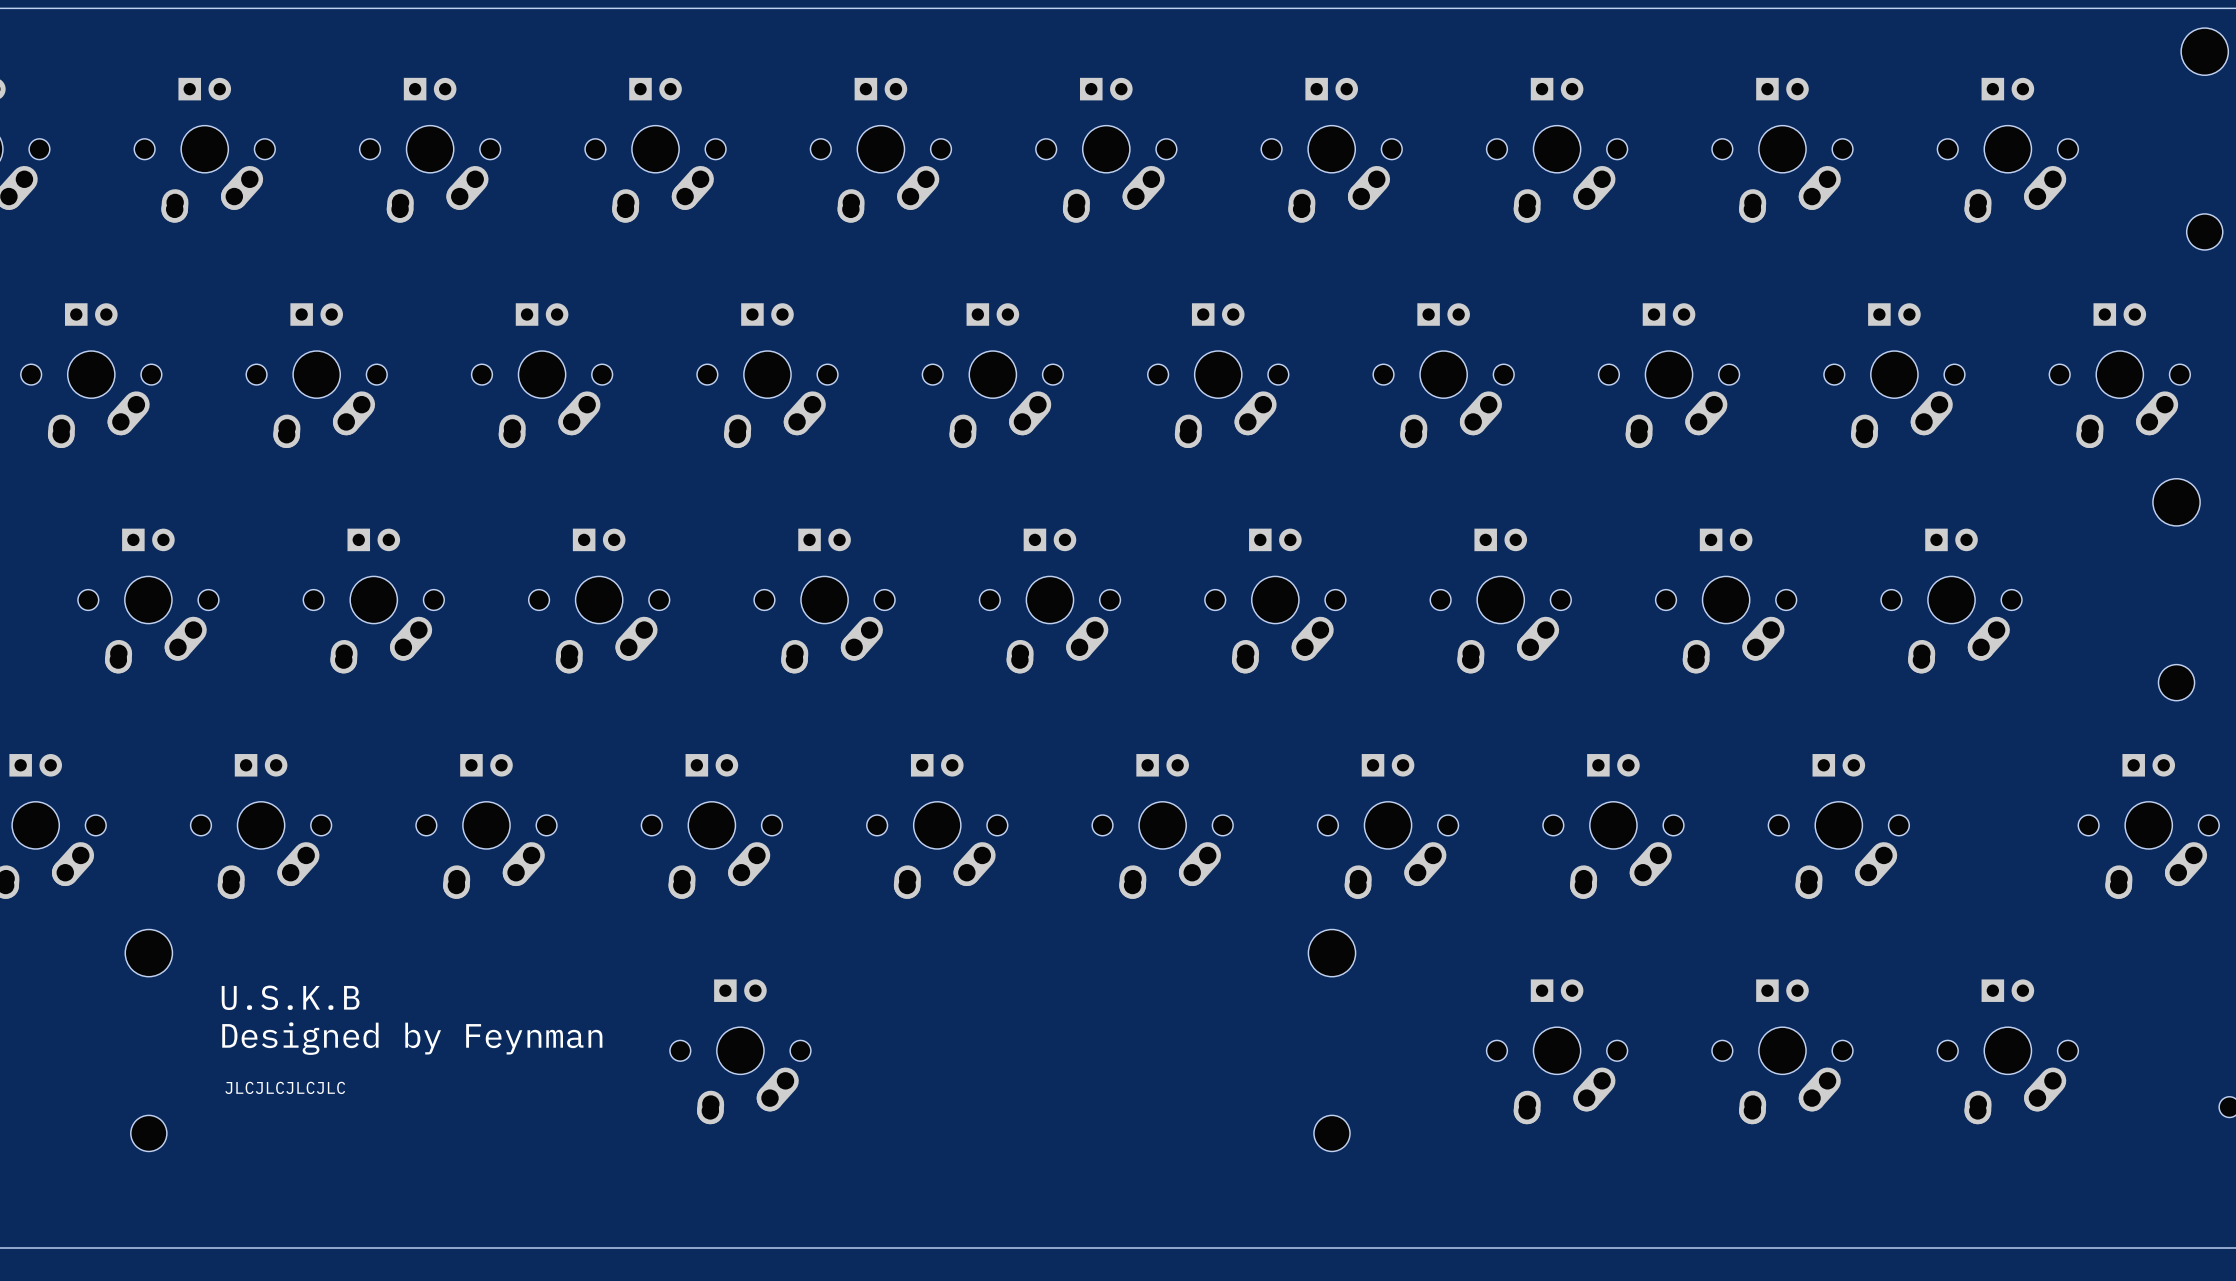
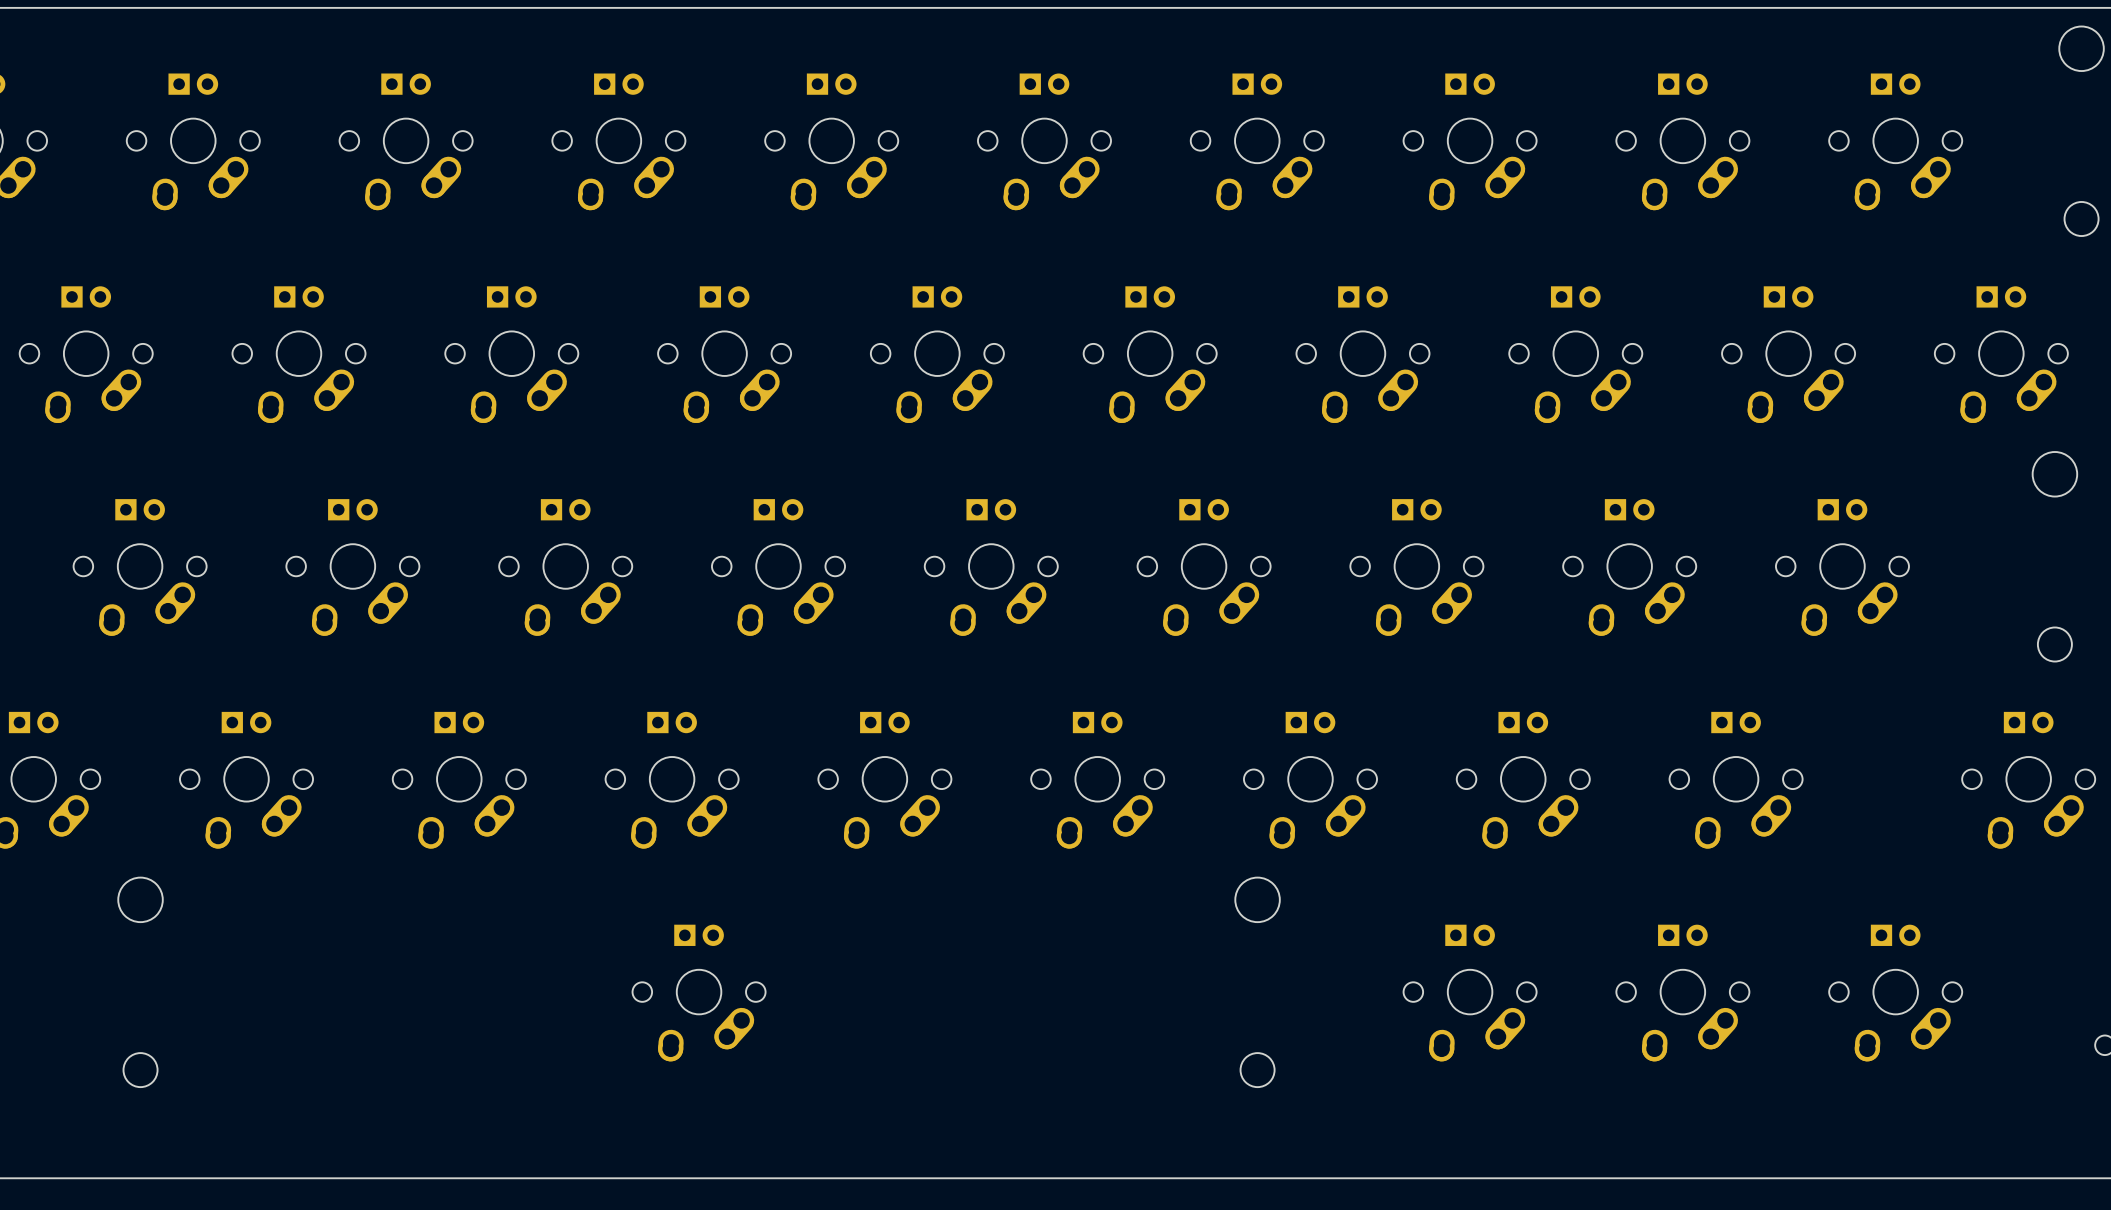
text: U.S.K.B (290, 997) -> none
text: Designed by Feynman (412, 1038) -> none
text: JLCJLCJLCJLC (285, 1087) -> none

